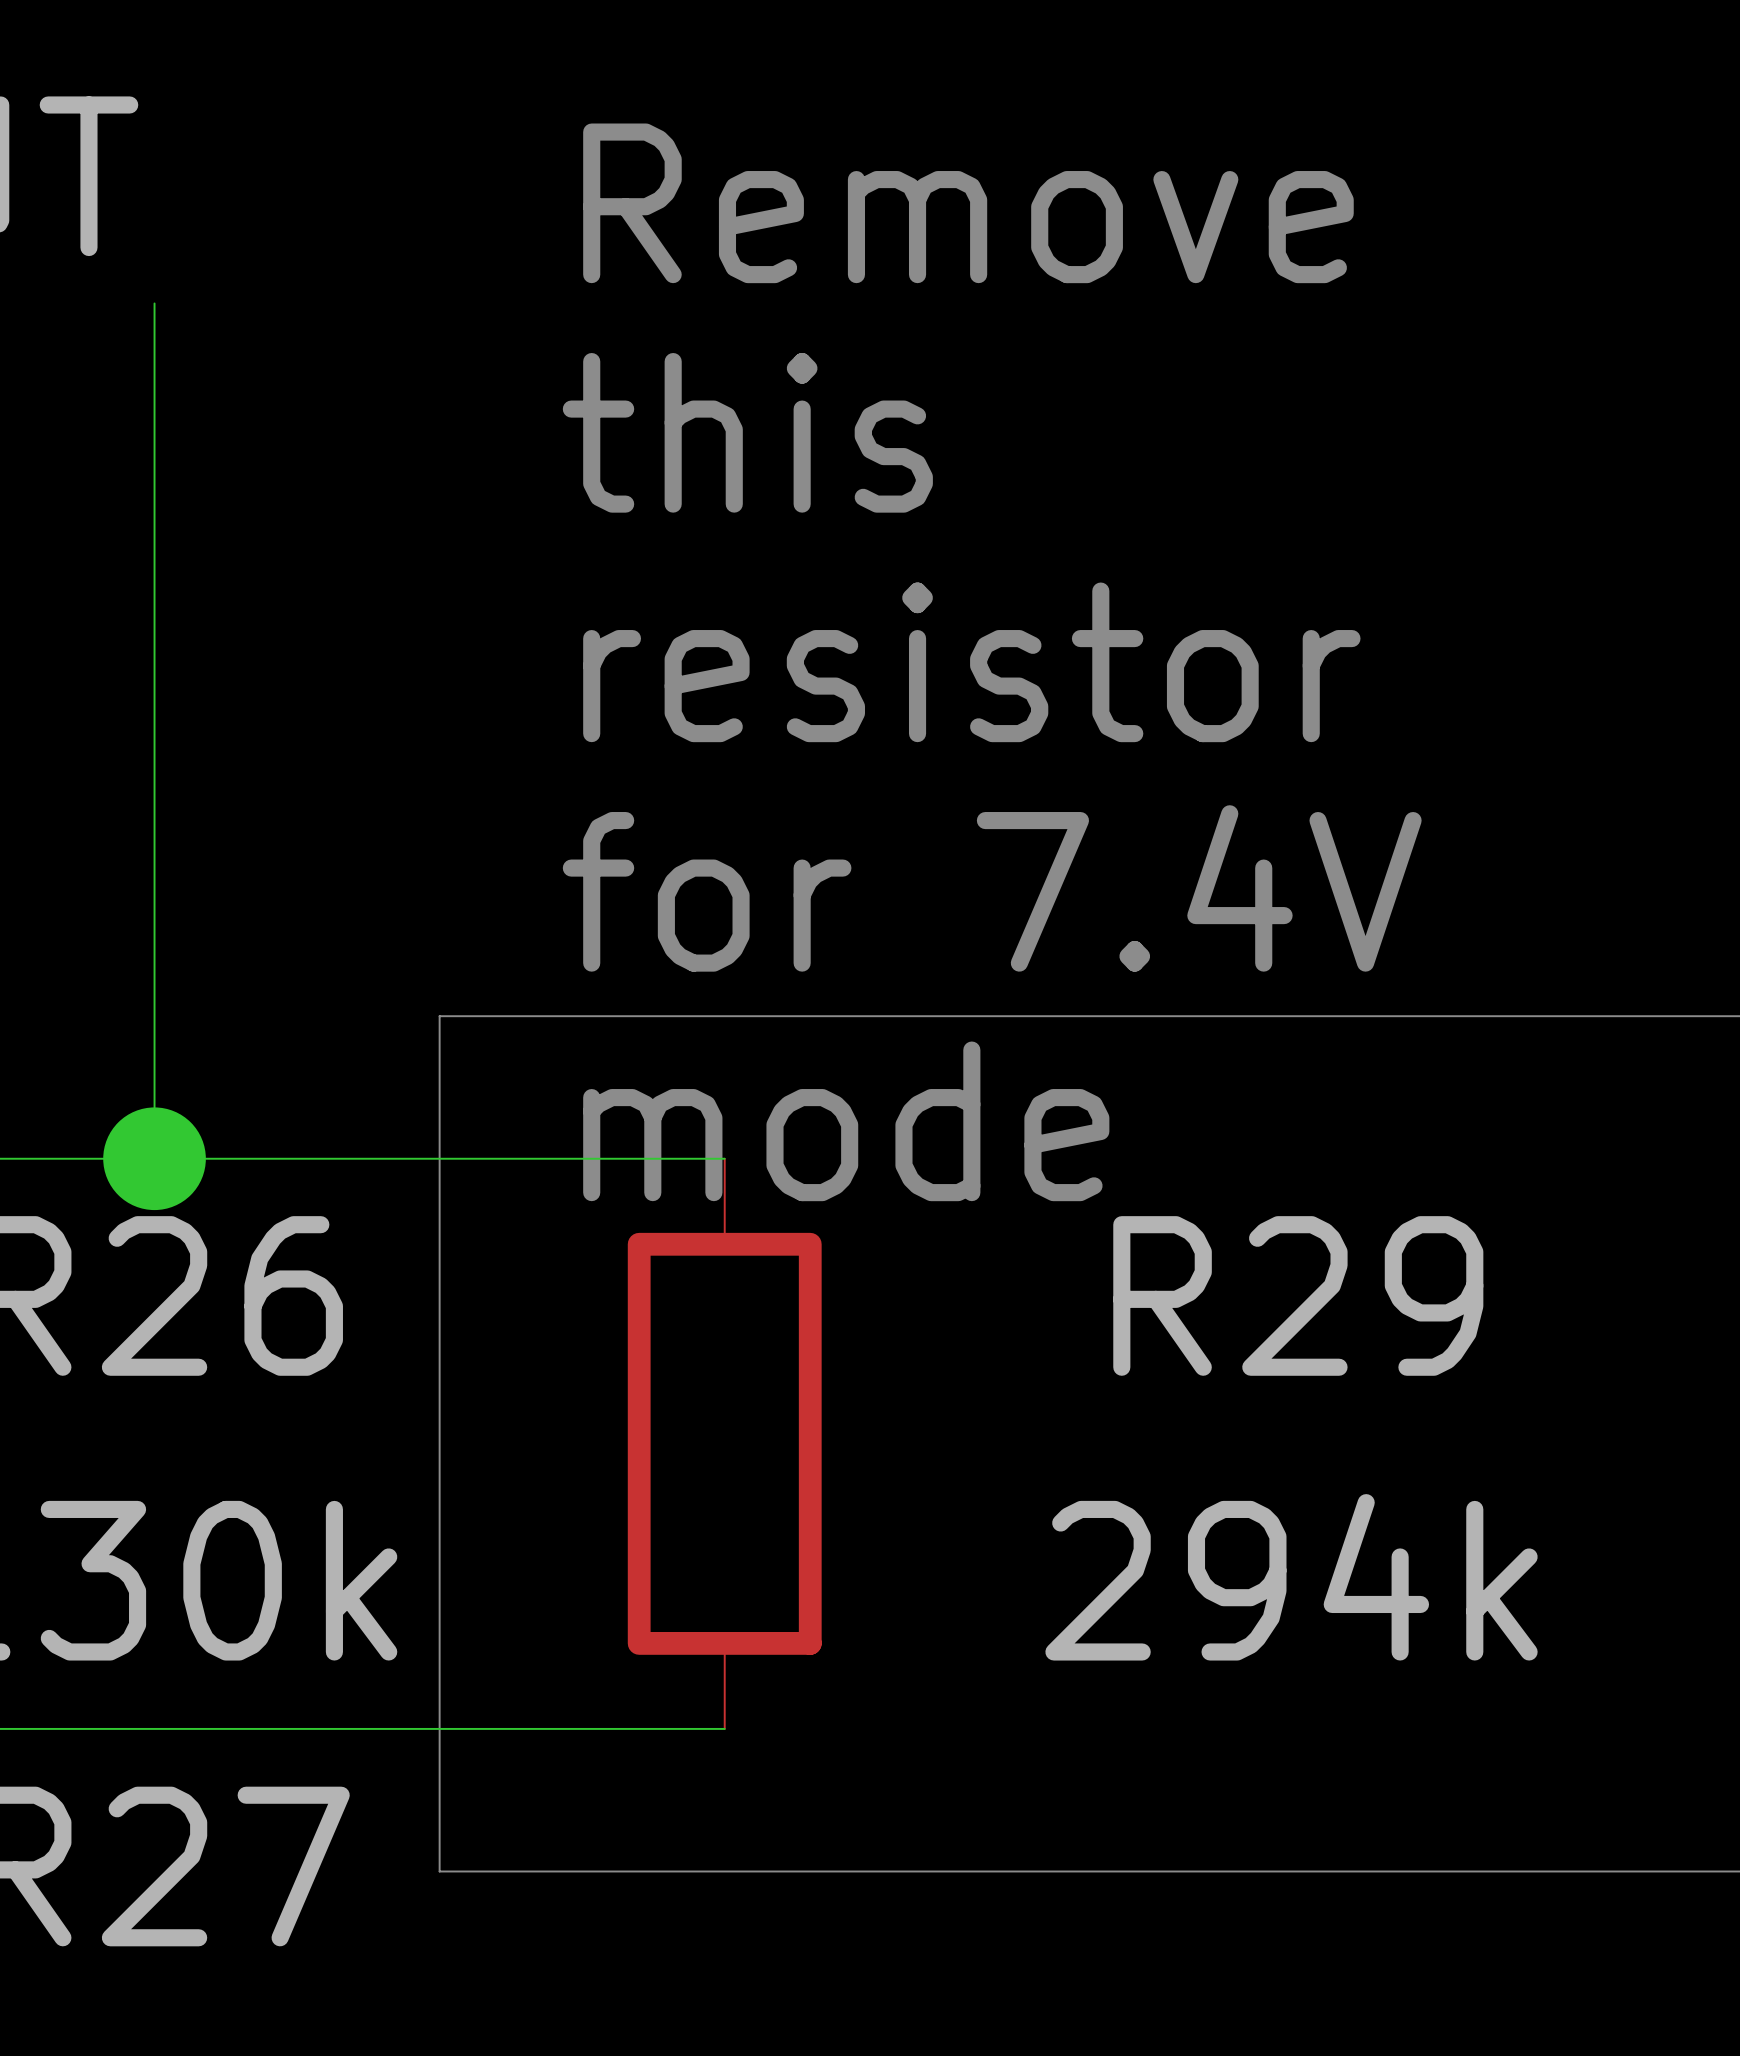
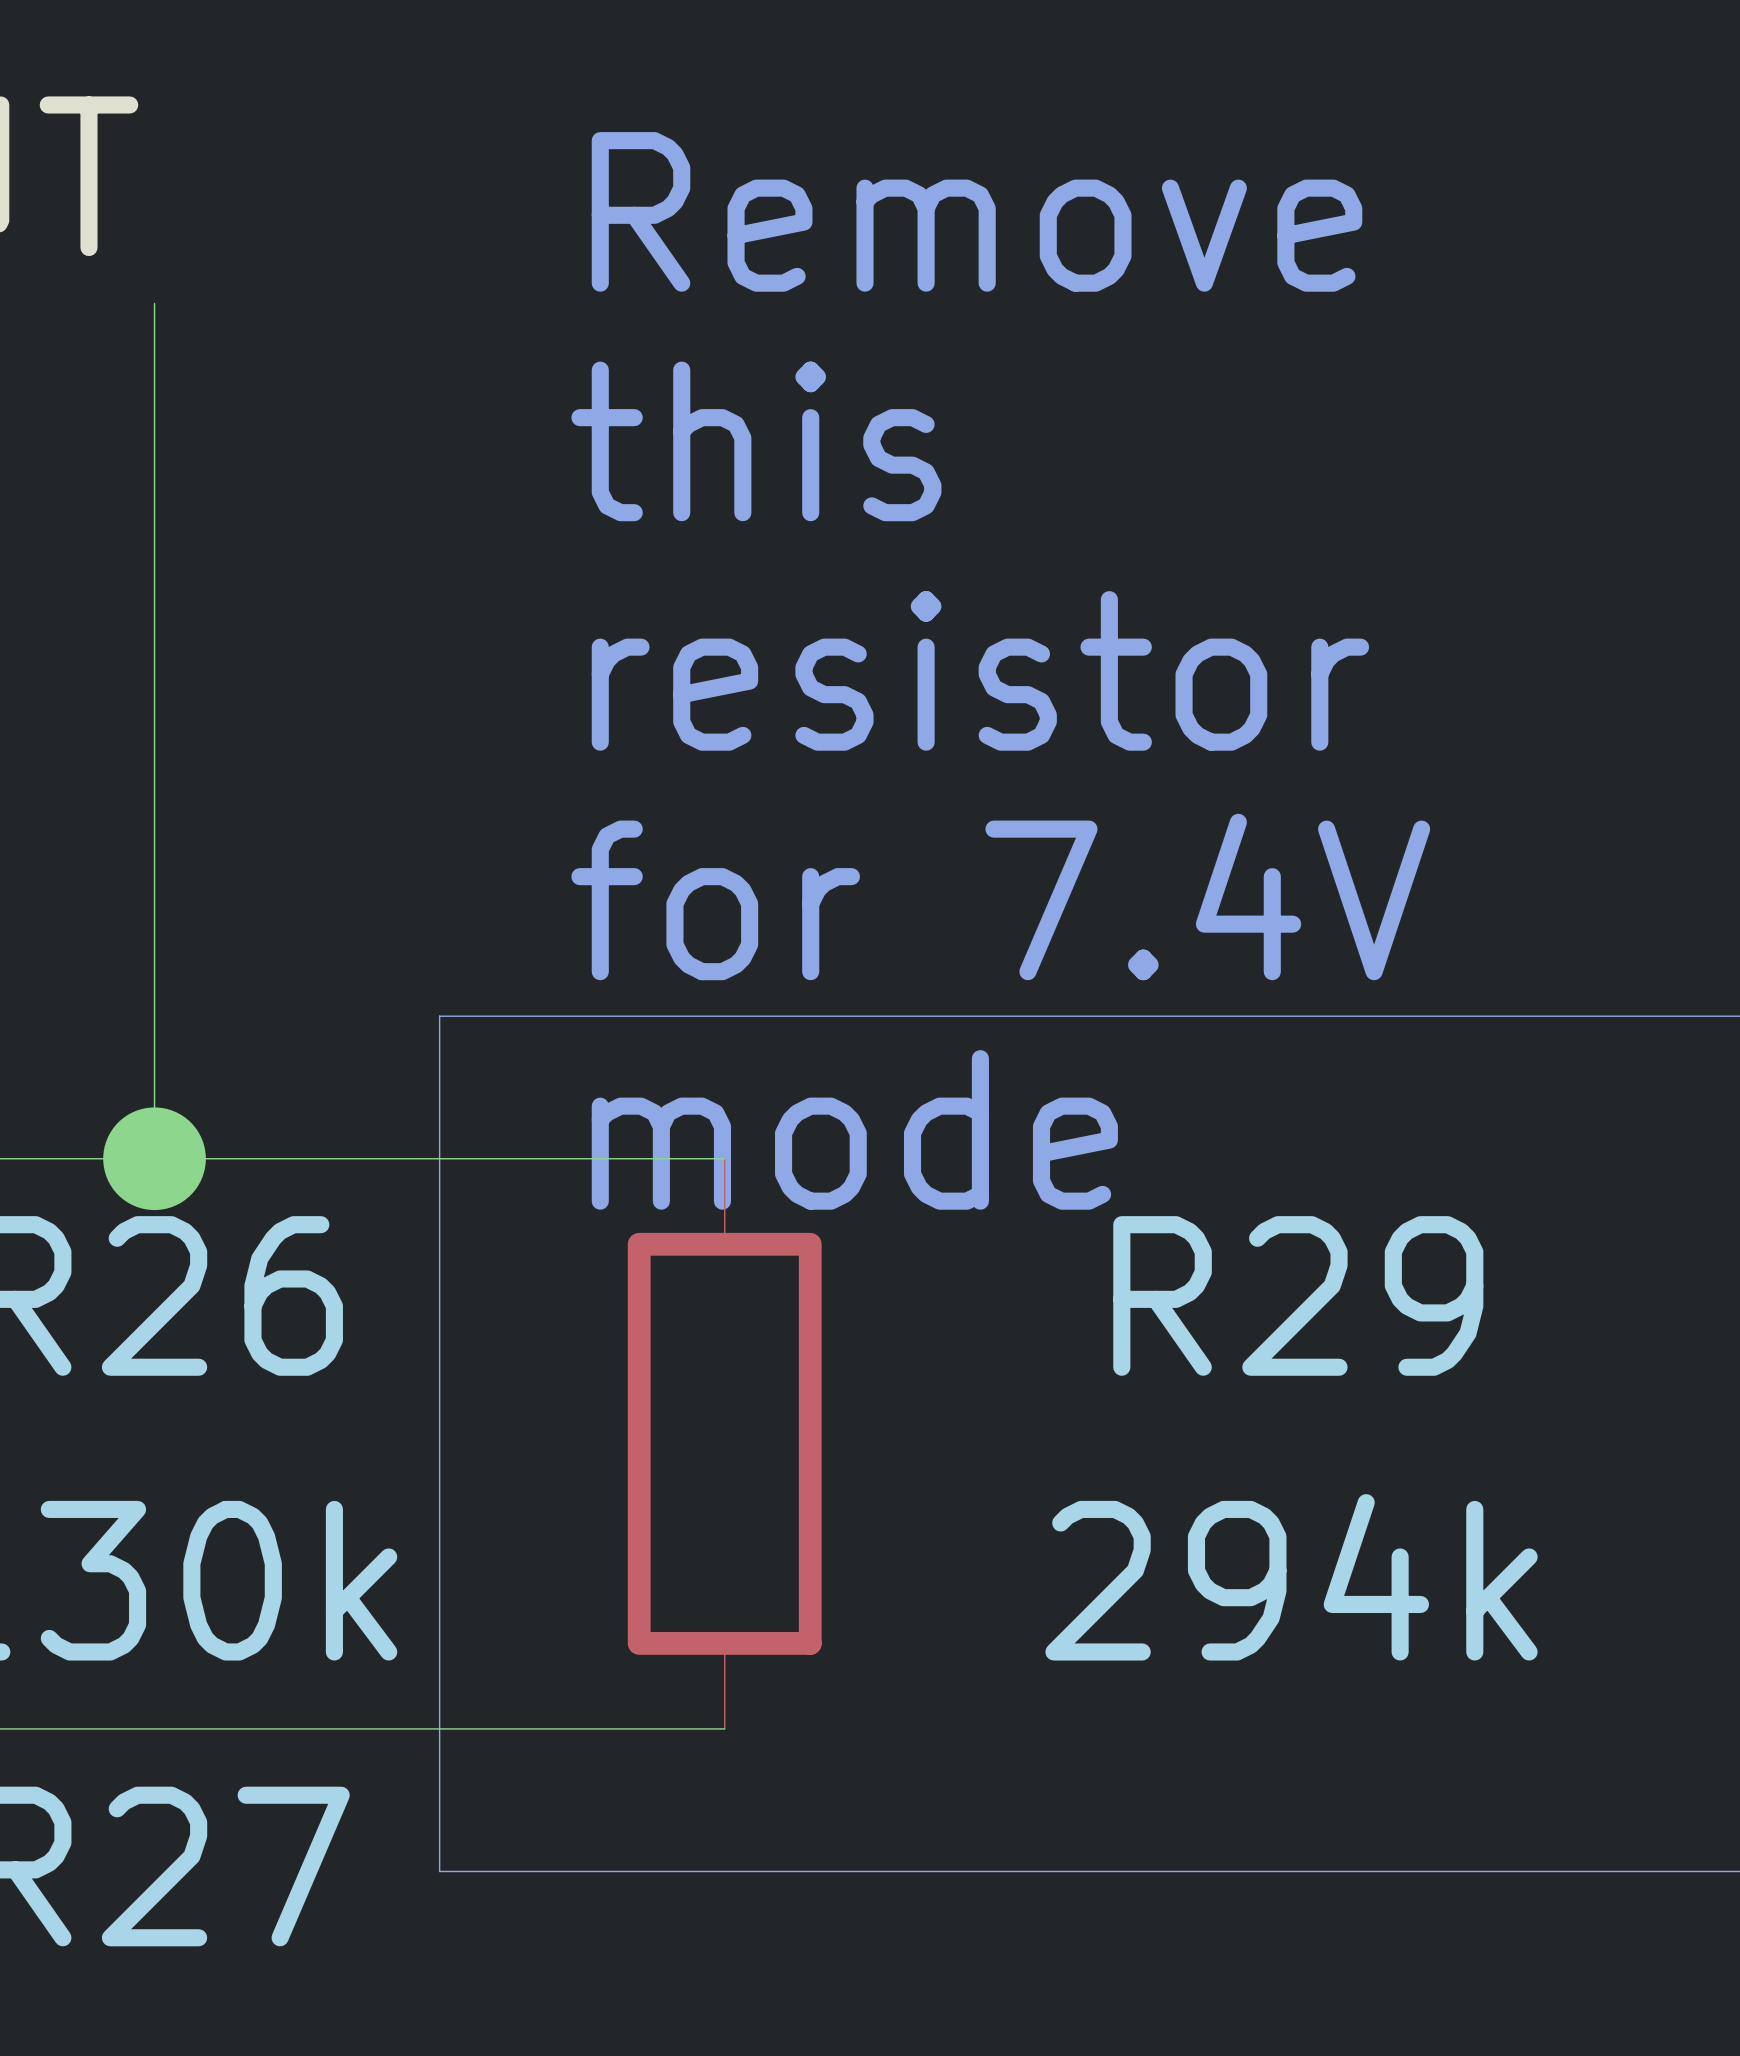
text position: Remove (968, 203) -> Remove (977, 211)
text position: this (747, 432) -> this (756, 441)
text position: resistor (971, 662) -> resistor (980, 670)
text position: for 7.4V (992, 888) -> for 7.4V (1000, 897)
text position: mode (846, 1121) -> mode (854, 1129)

